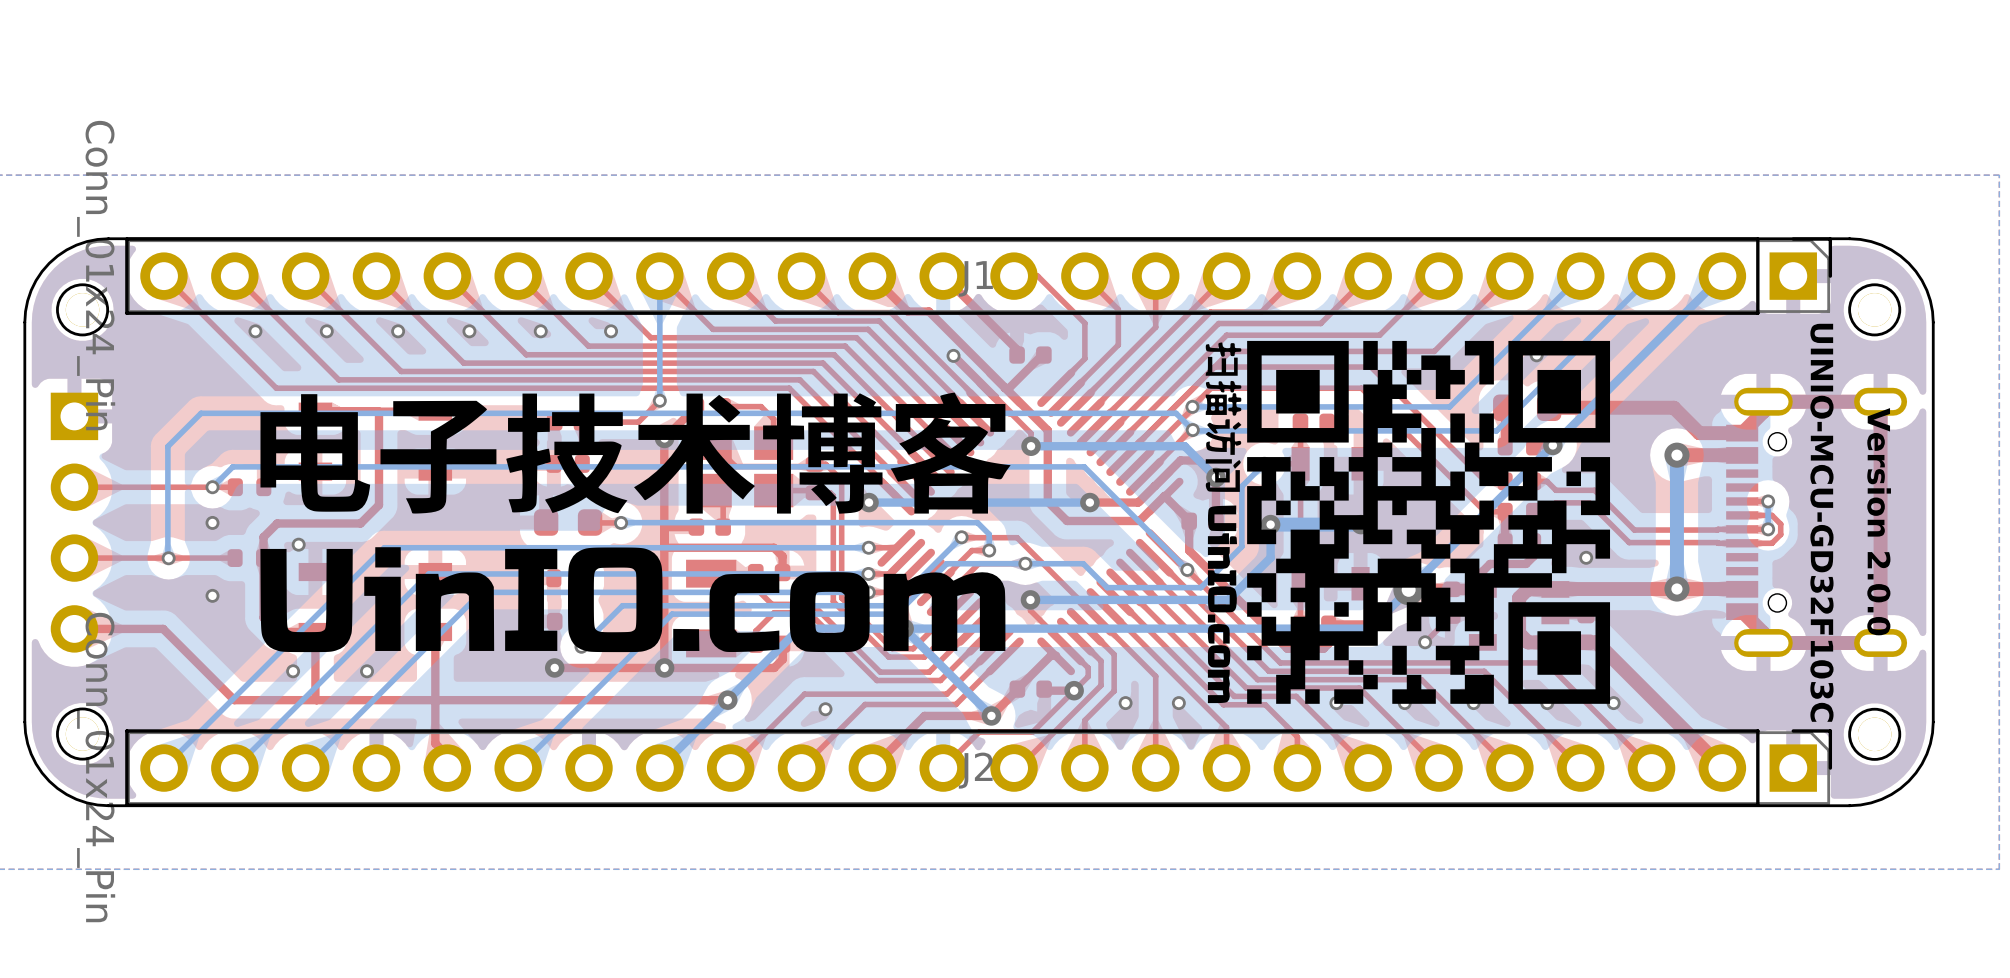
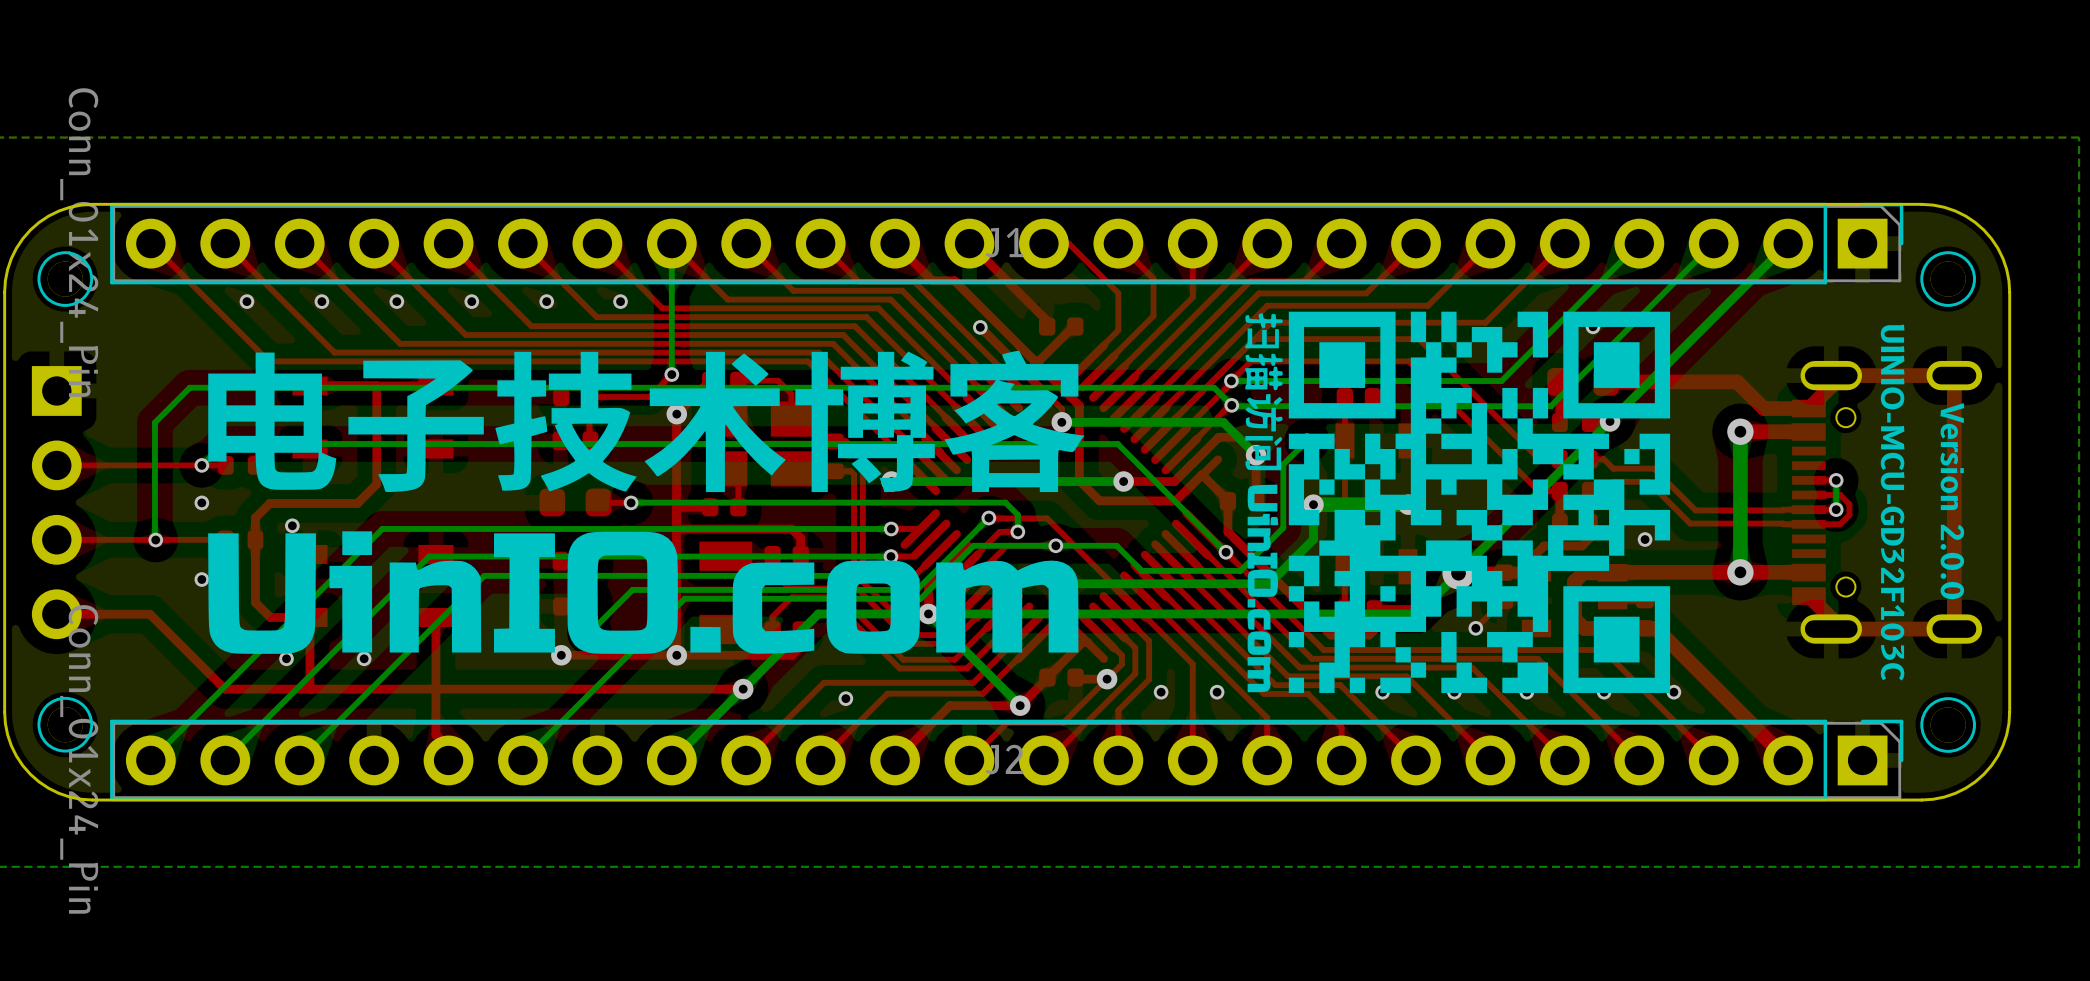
drawing shape: [260, 392, 1011, 653] -> [208, 350, 1085, 654]

